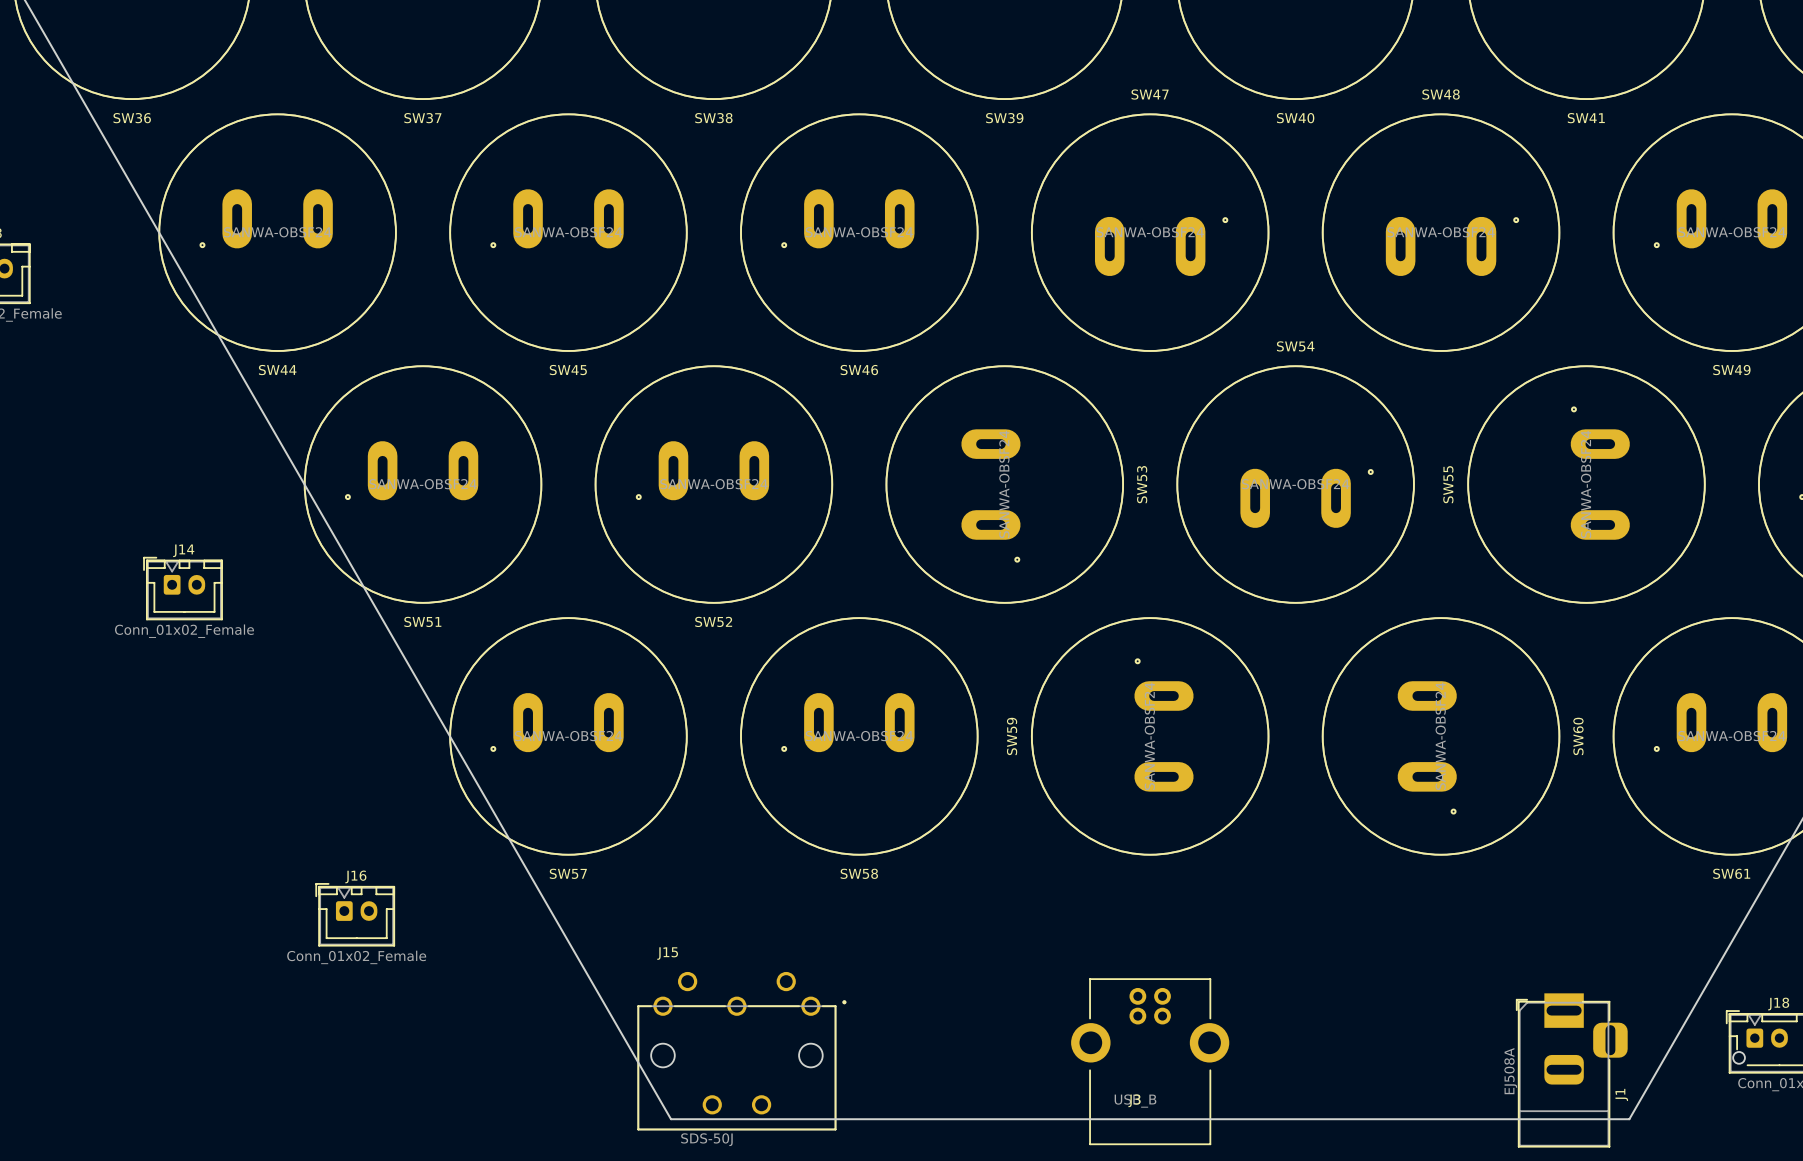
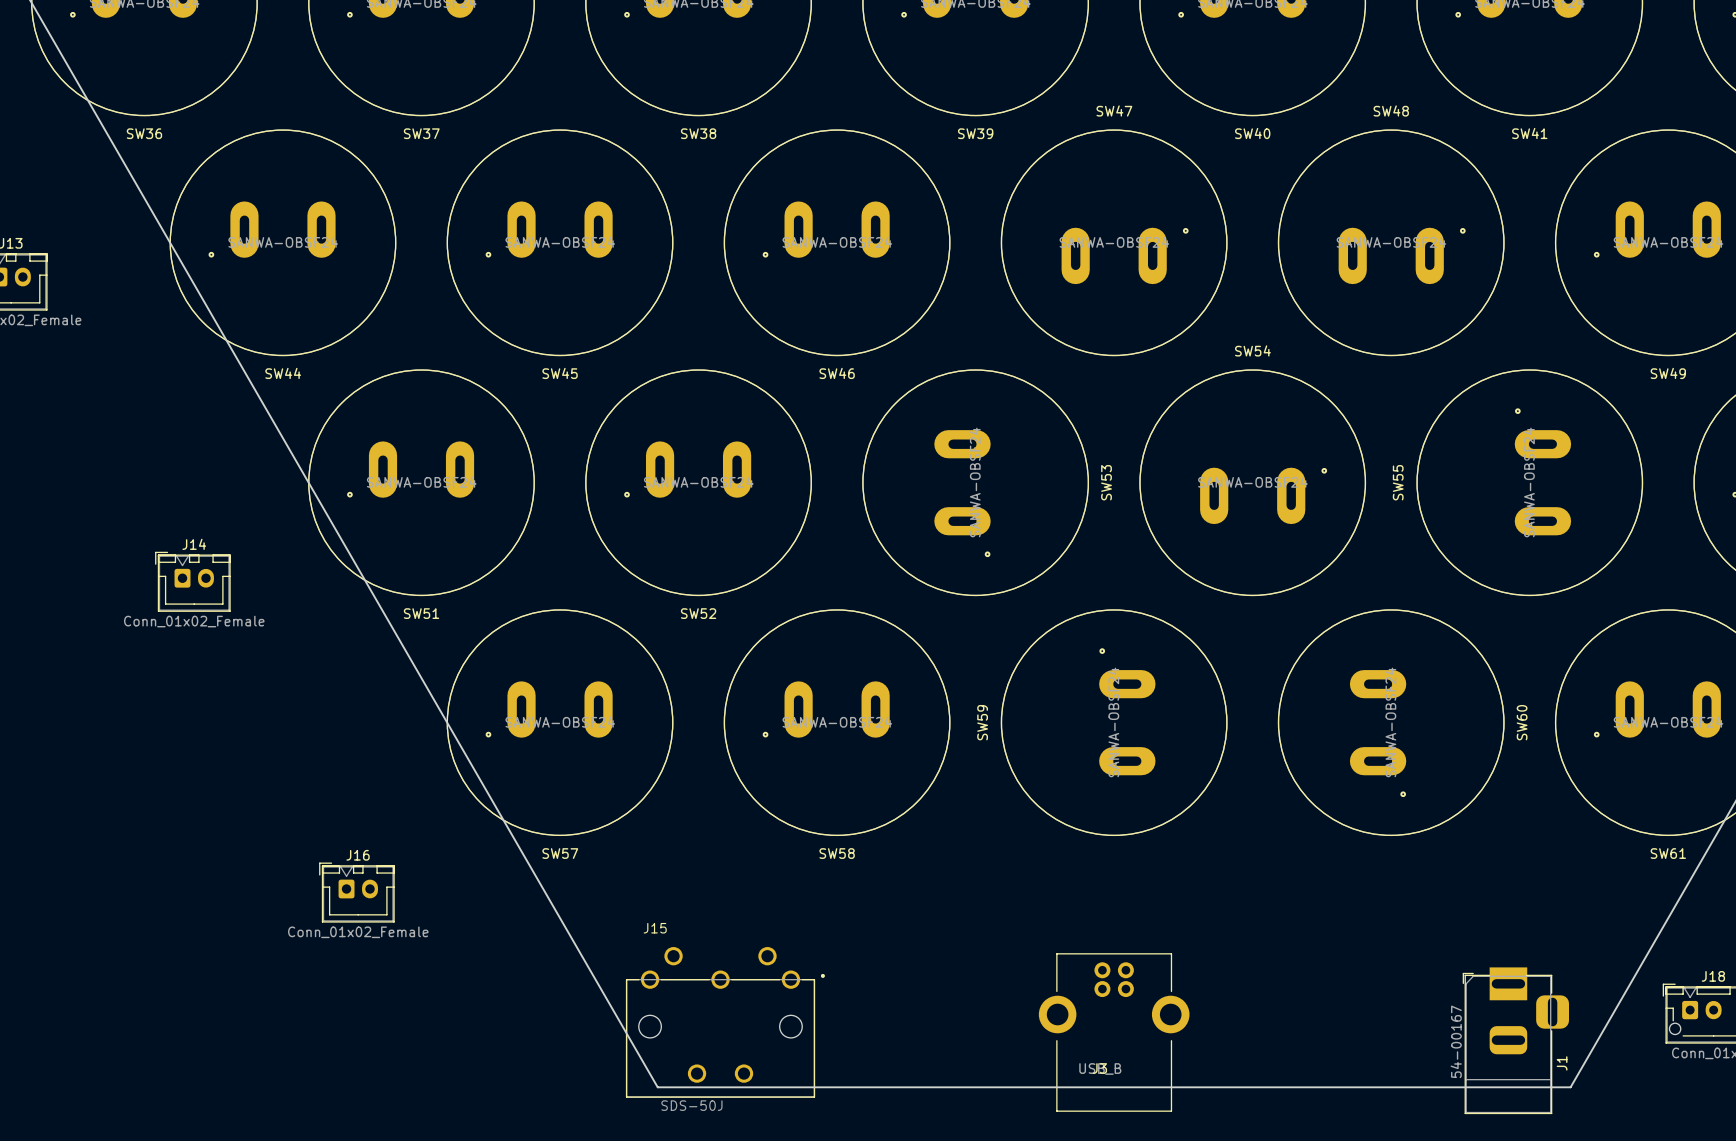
J1 value: EJ508A (1510, 1071) -> 54-00167 (1456, 1041)

